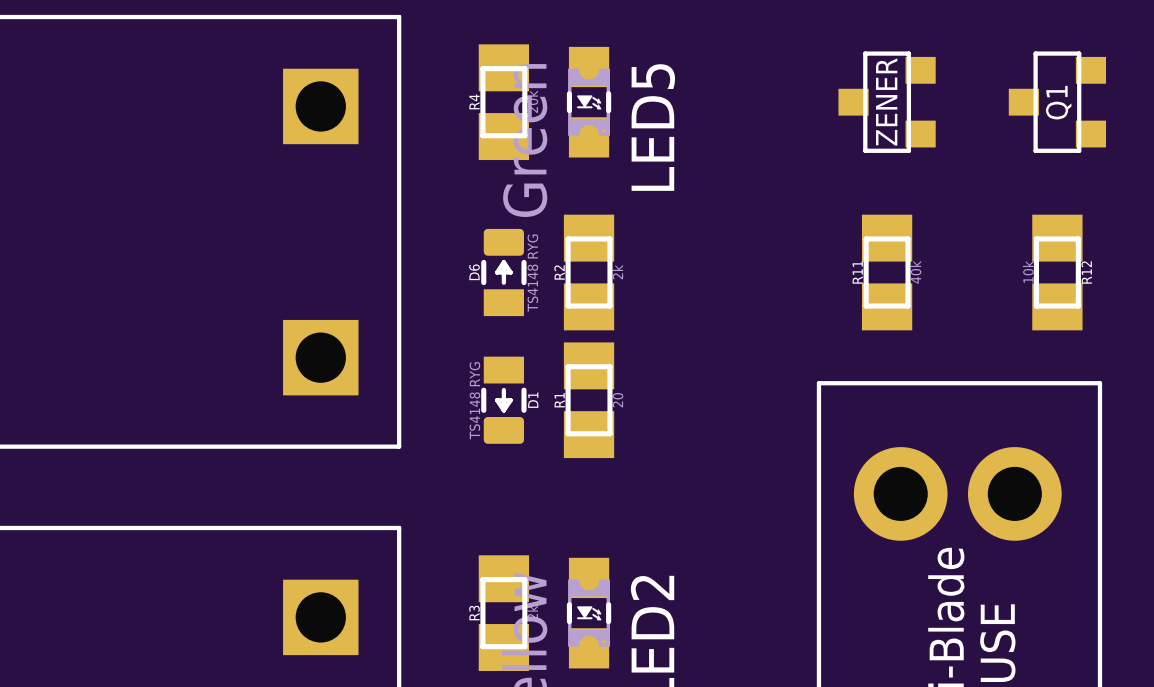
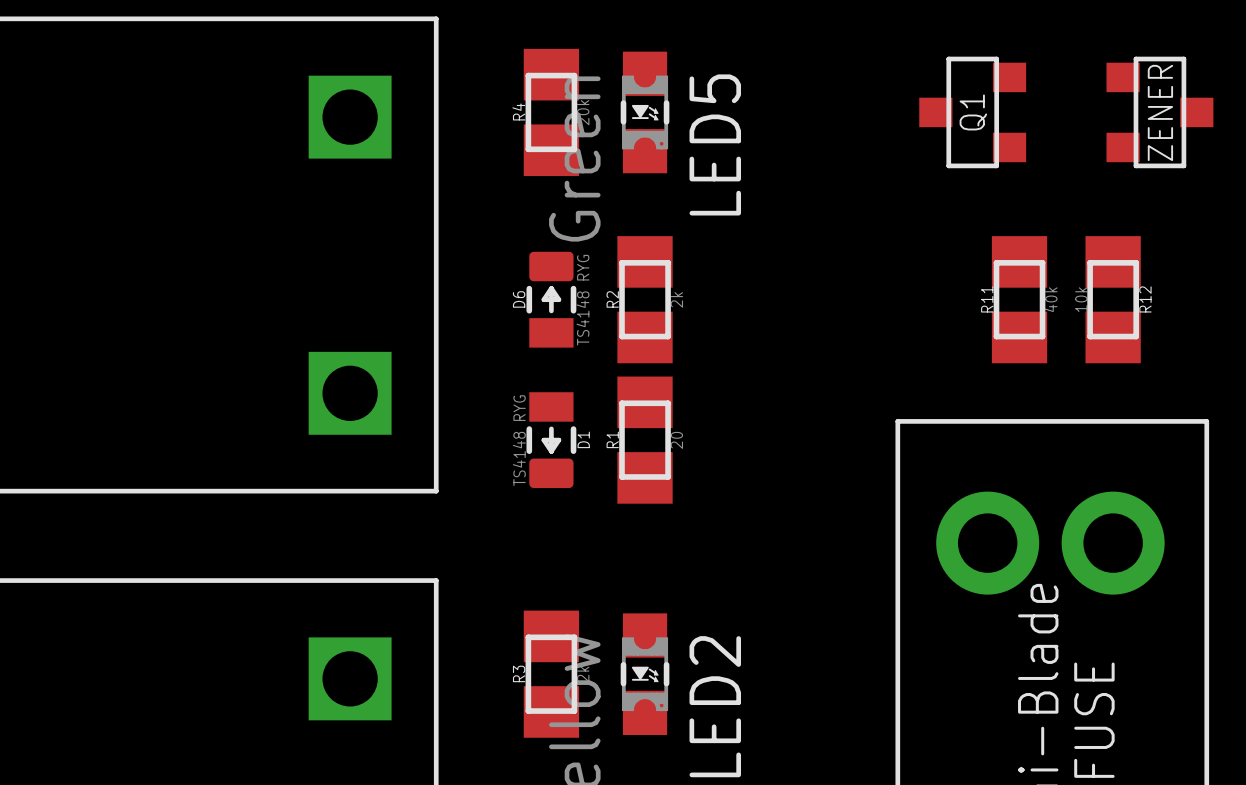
ZENER name: ZENER (886, 101) -> Q1 (973, 112)
Q1: (1057, 102) -> none
ZENER: none -> (1159, 112)
R11 position: (887, 272) -> (1019, 299)
R12 position: (1057, 272) -> (1113, 299)

